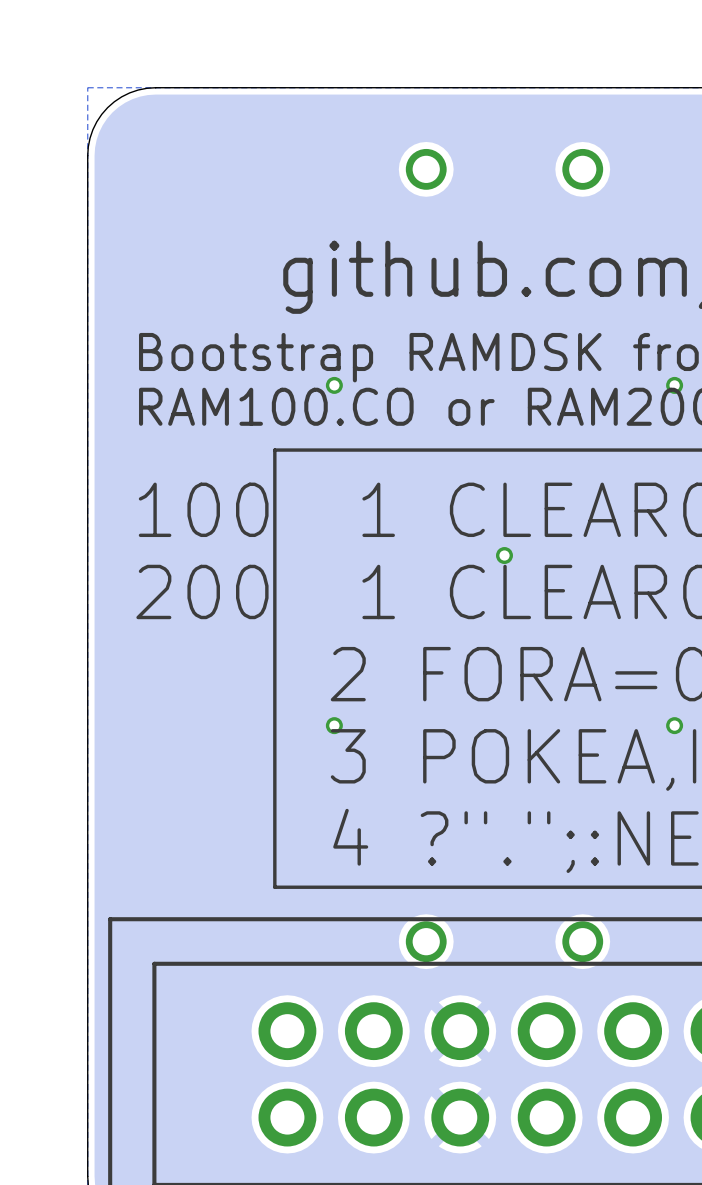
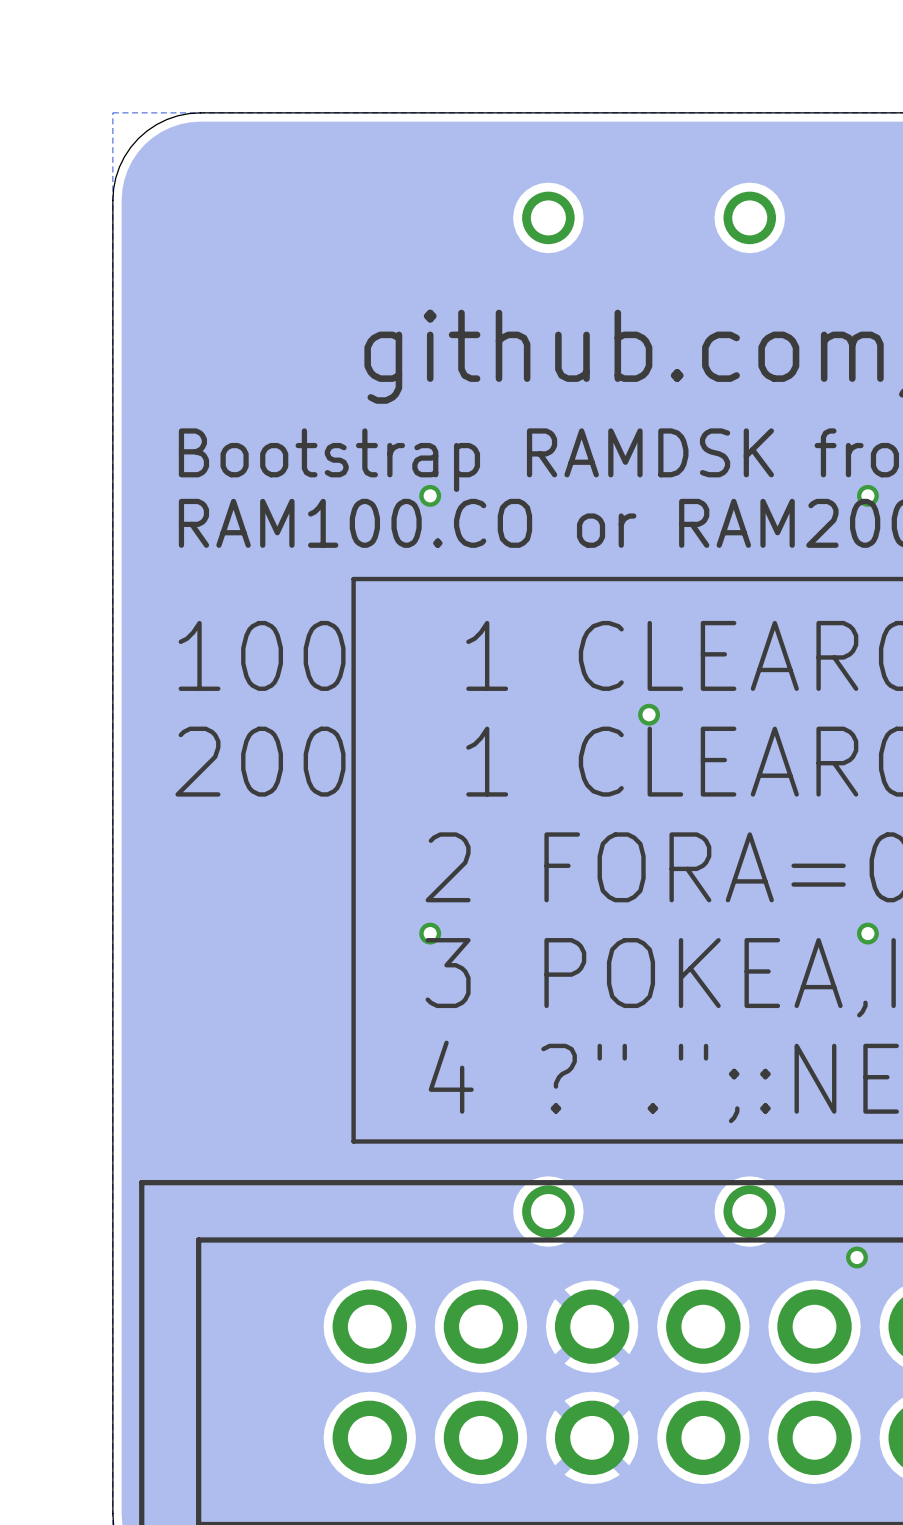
via: none -> (856, 1257)

